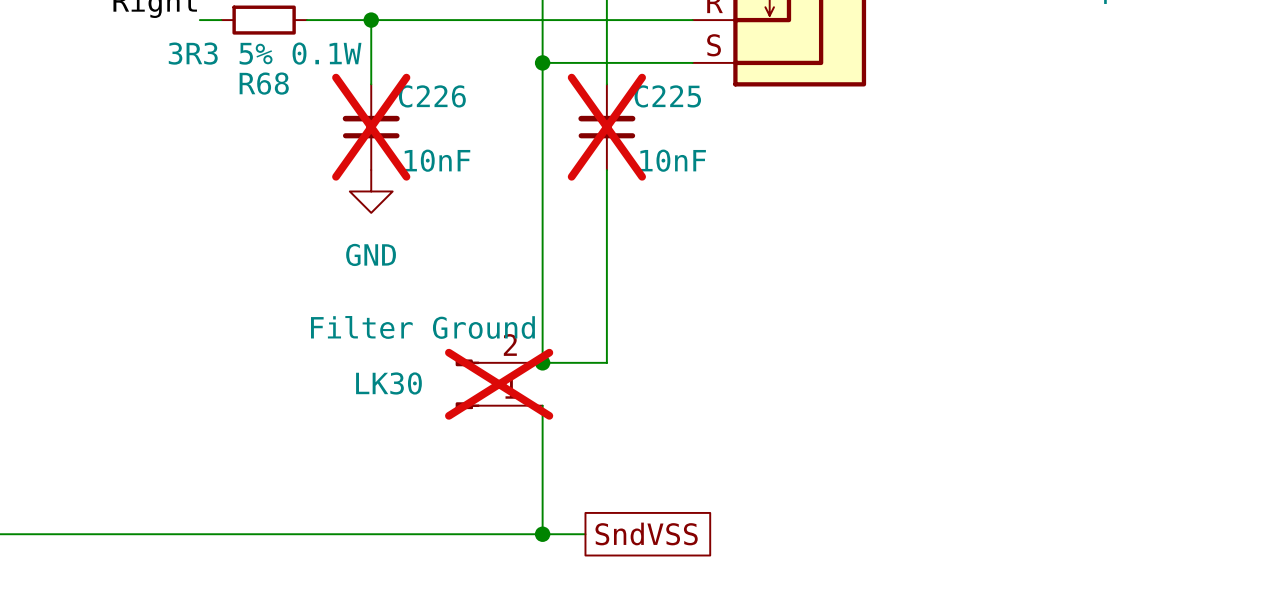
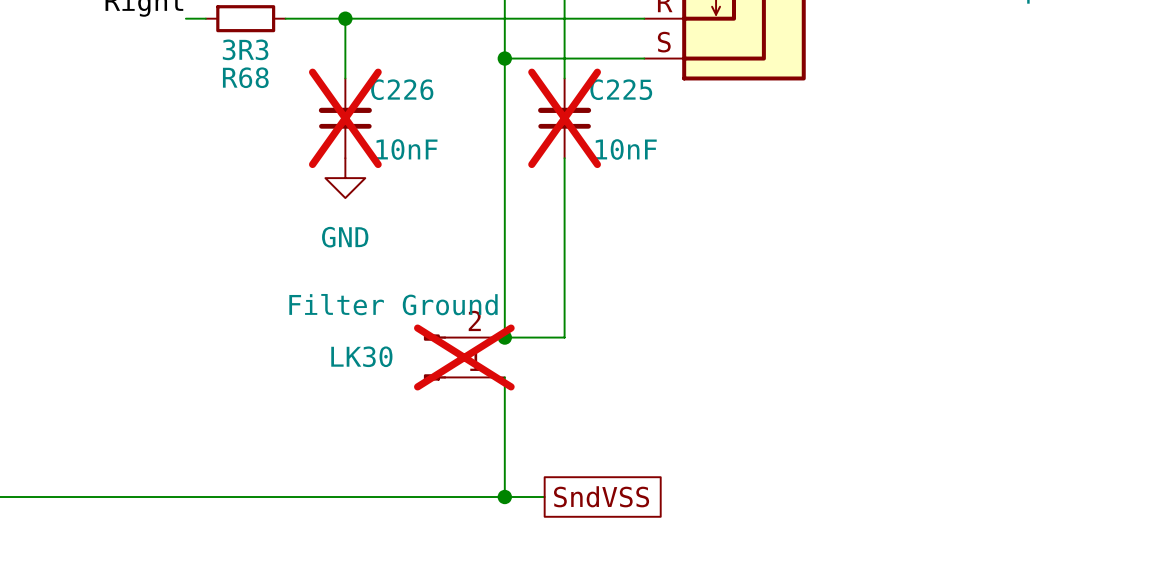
R68 value: 3R3 5% 0.1W (265, 53) -> 3R3 (245, 49)

